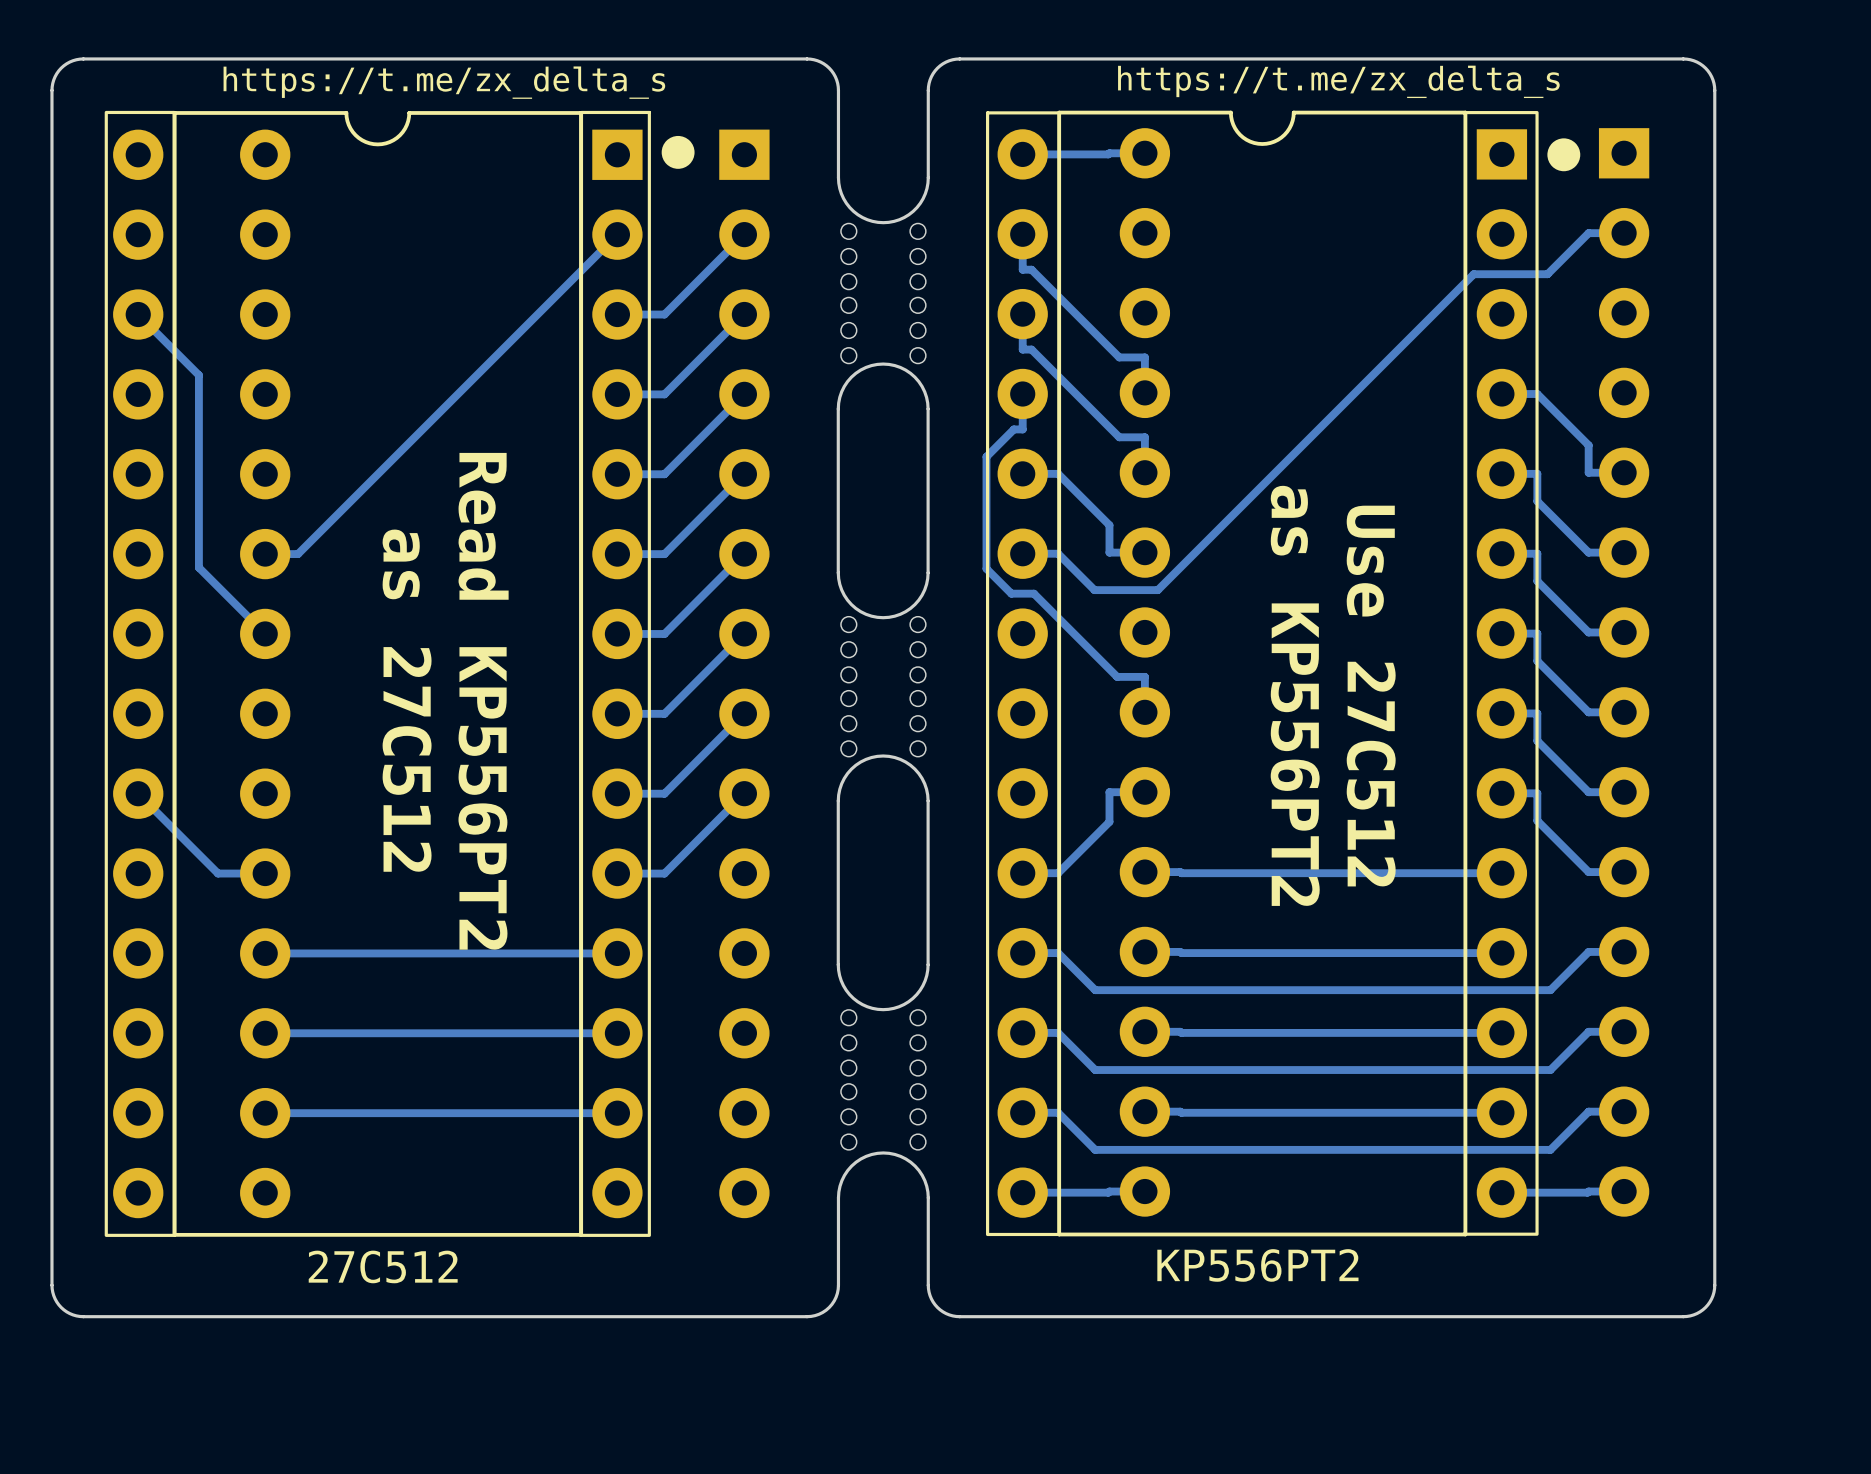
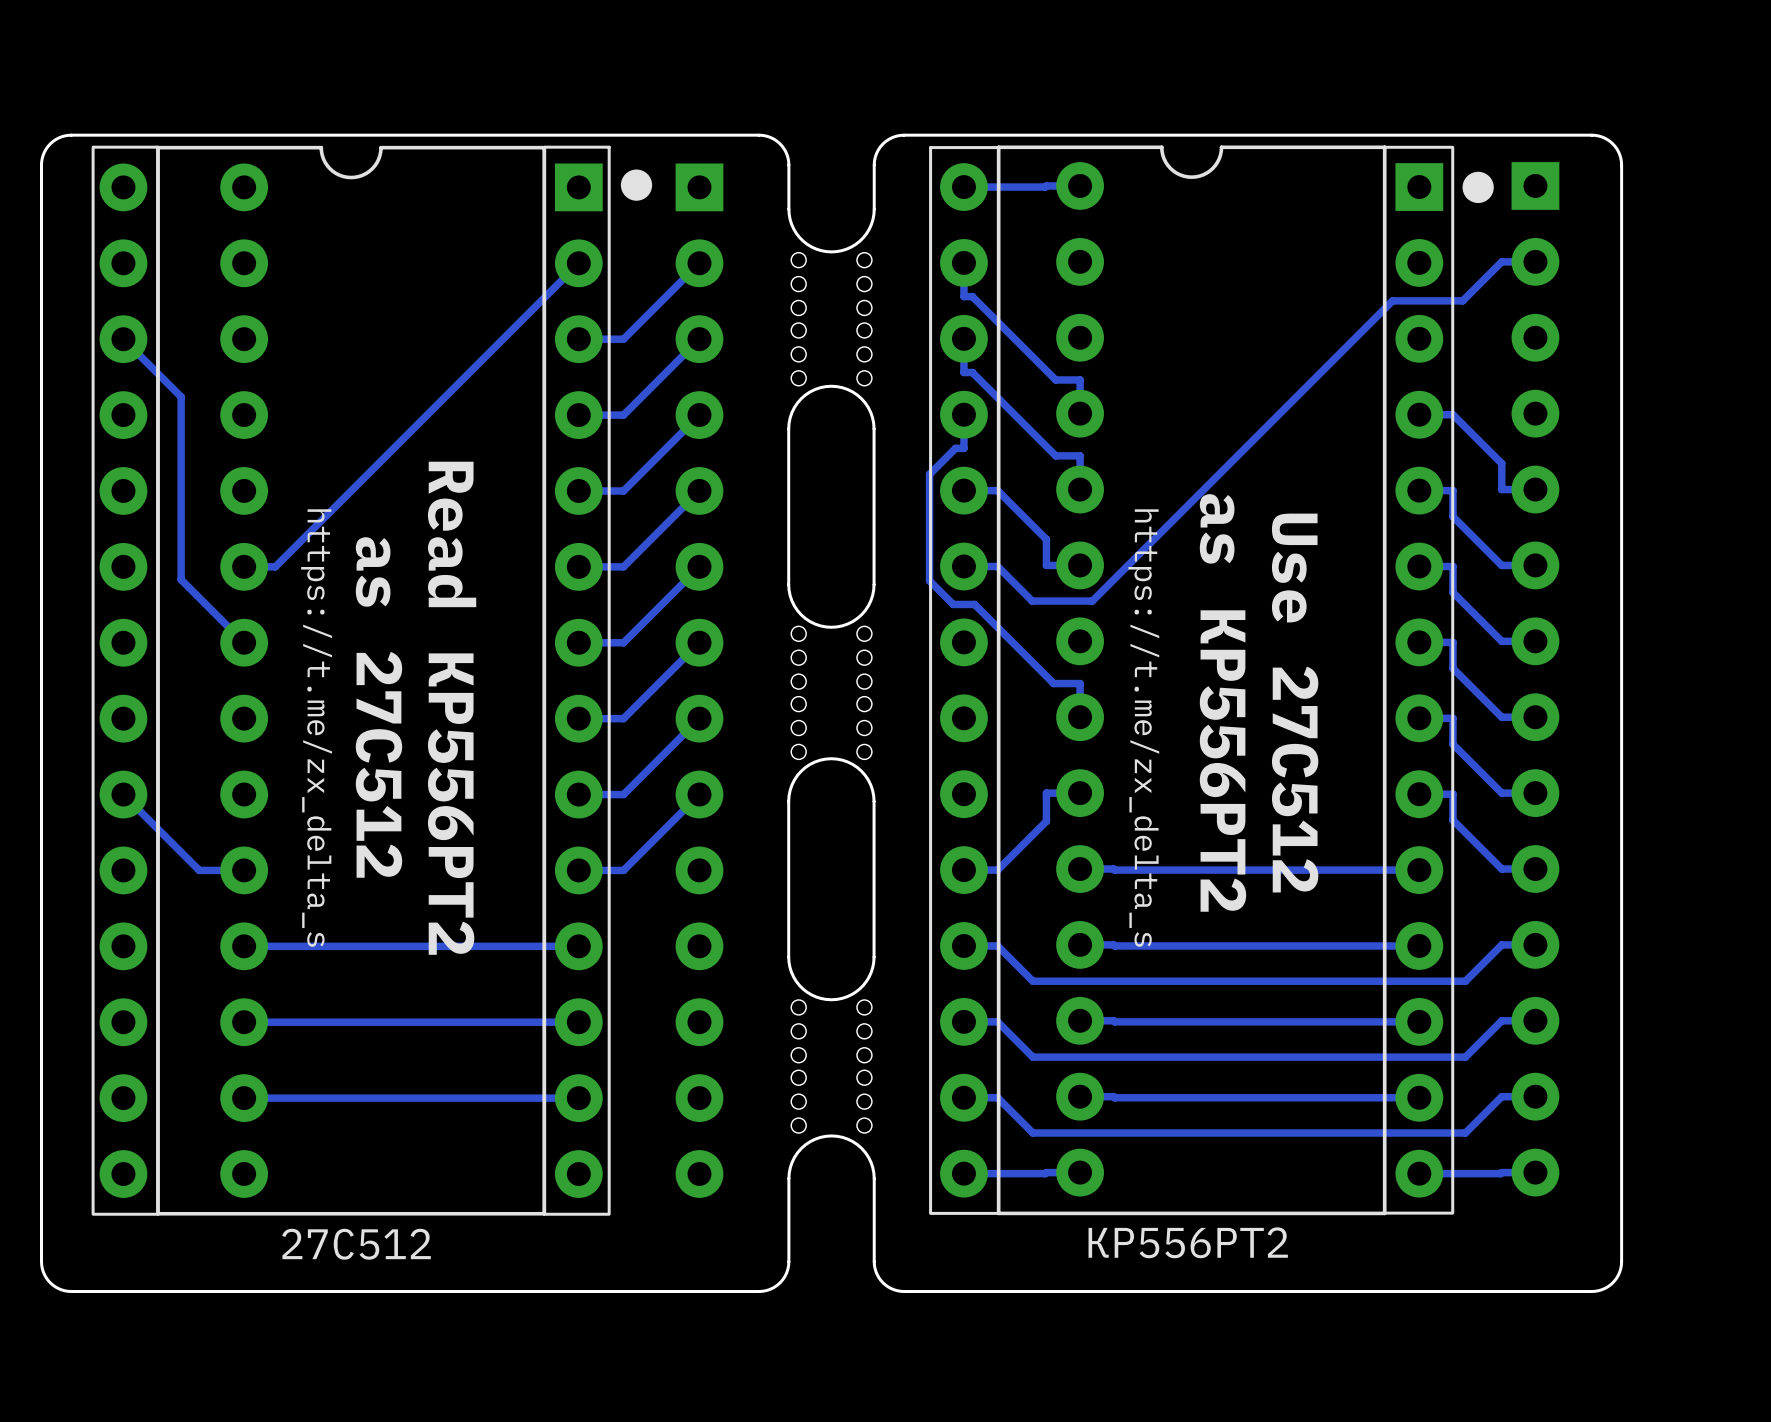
text rotation: 0° (1338, 81) -> 90° clockwise (1143, 728)
text position: https://t.me/zx_delta_s (1338, 81) -> https://t.me/zx_delta_s (1143, 728)
text rotation: 0° (444, 82) -> 90° clockwise (316, 728)
text position: https://t.me/zx_delta_s (444, 82) -> https://t.me/zx_delta_s (316, 728)
board edge: (838, 131) (838, 86) (835, 76) (823, 63) (807, 58) (79, 59) (63, 65) (53, 80) (51, 131) -> (788, 165) (785, 152) (780, 143) (768, 136) (758, 135) (71, 135) (58, 138) (50, 143) (44, 152) (41, 165)
board edge: (1714, 131) (1714, 86) (1711, 76) (1700, 63) (1683, 58) (956, 59) (940, 65) (930, 80) (928, 131) -> (1621, 165) (1619, 155) (1612, 143) (1604, 138) (1591, 135) (904, 135) (892, 137) (882, 143) (876, 153) (874, 165)

